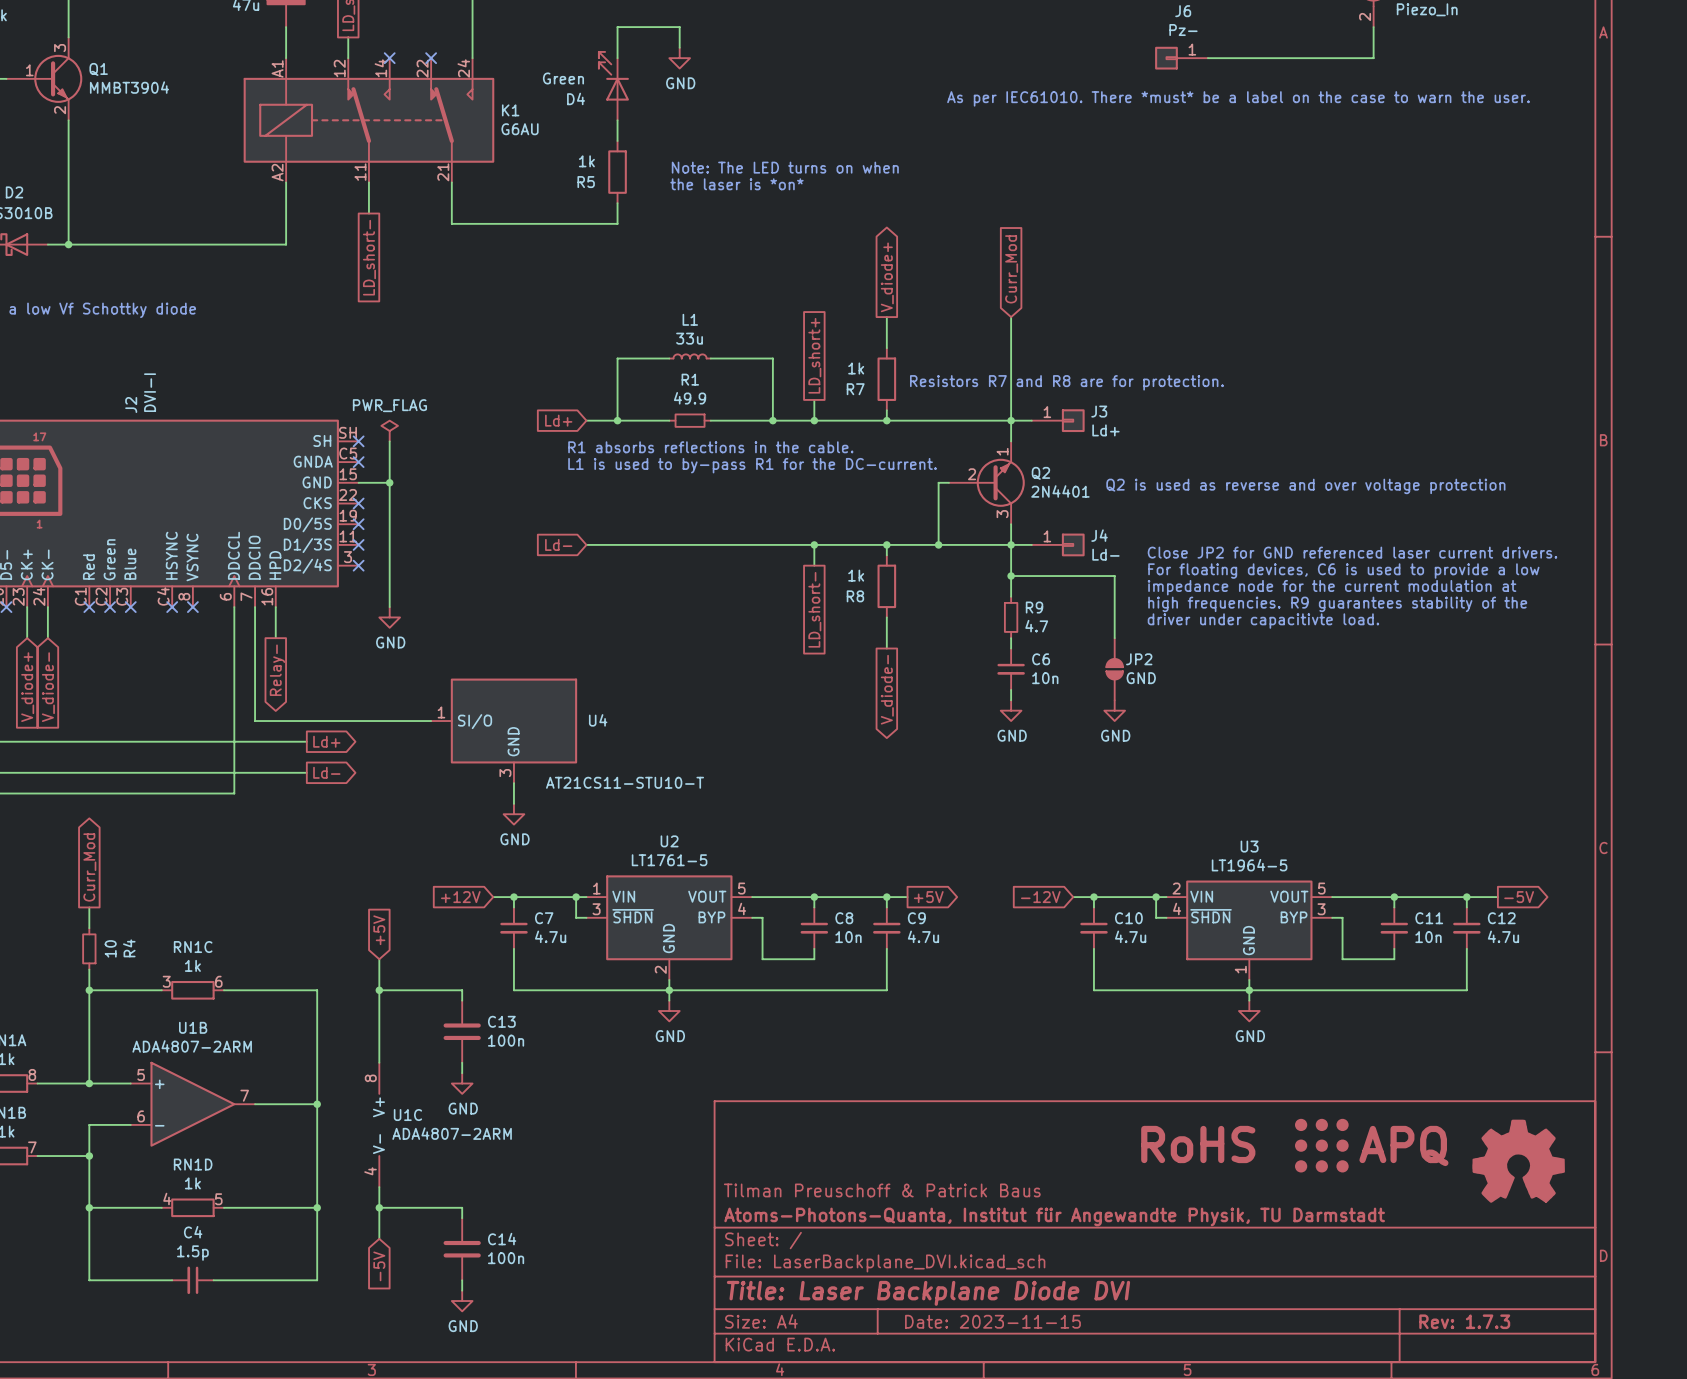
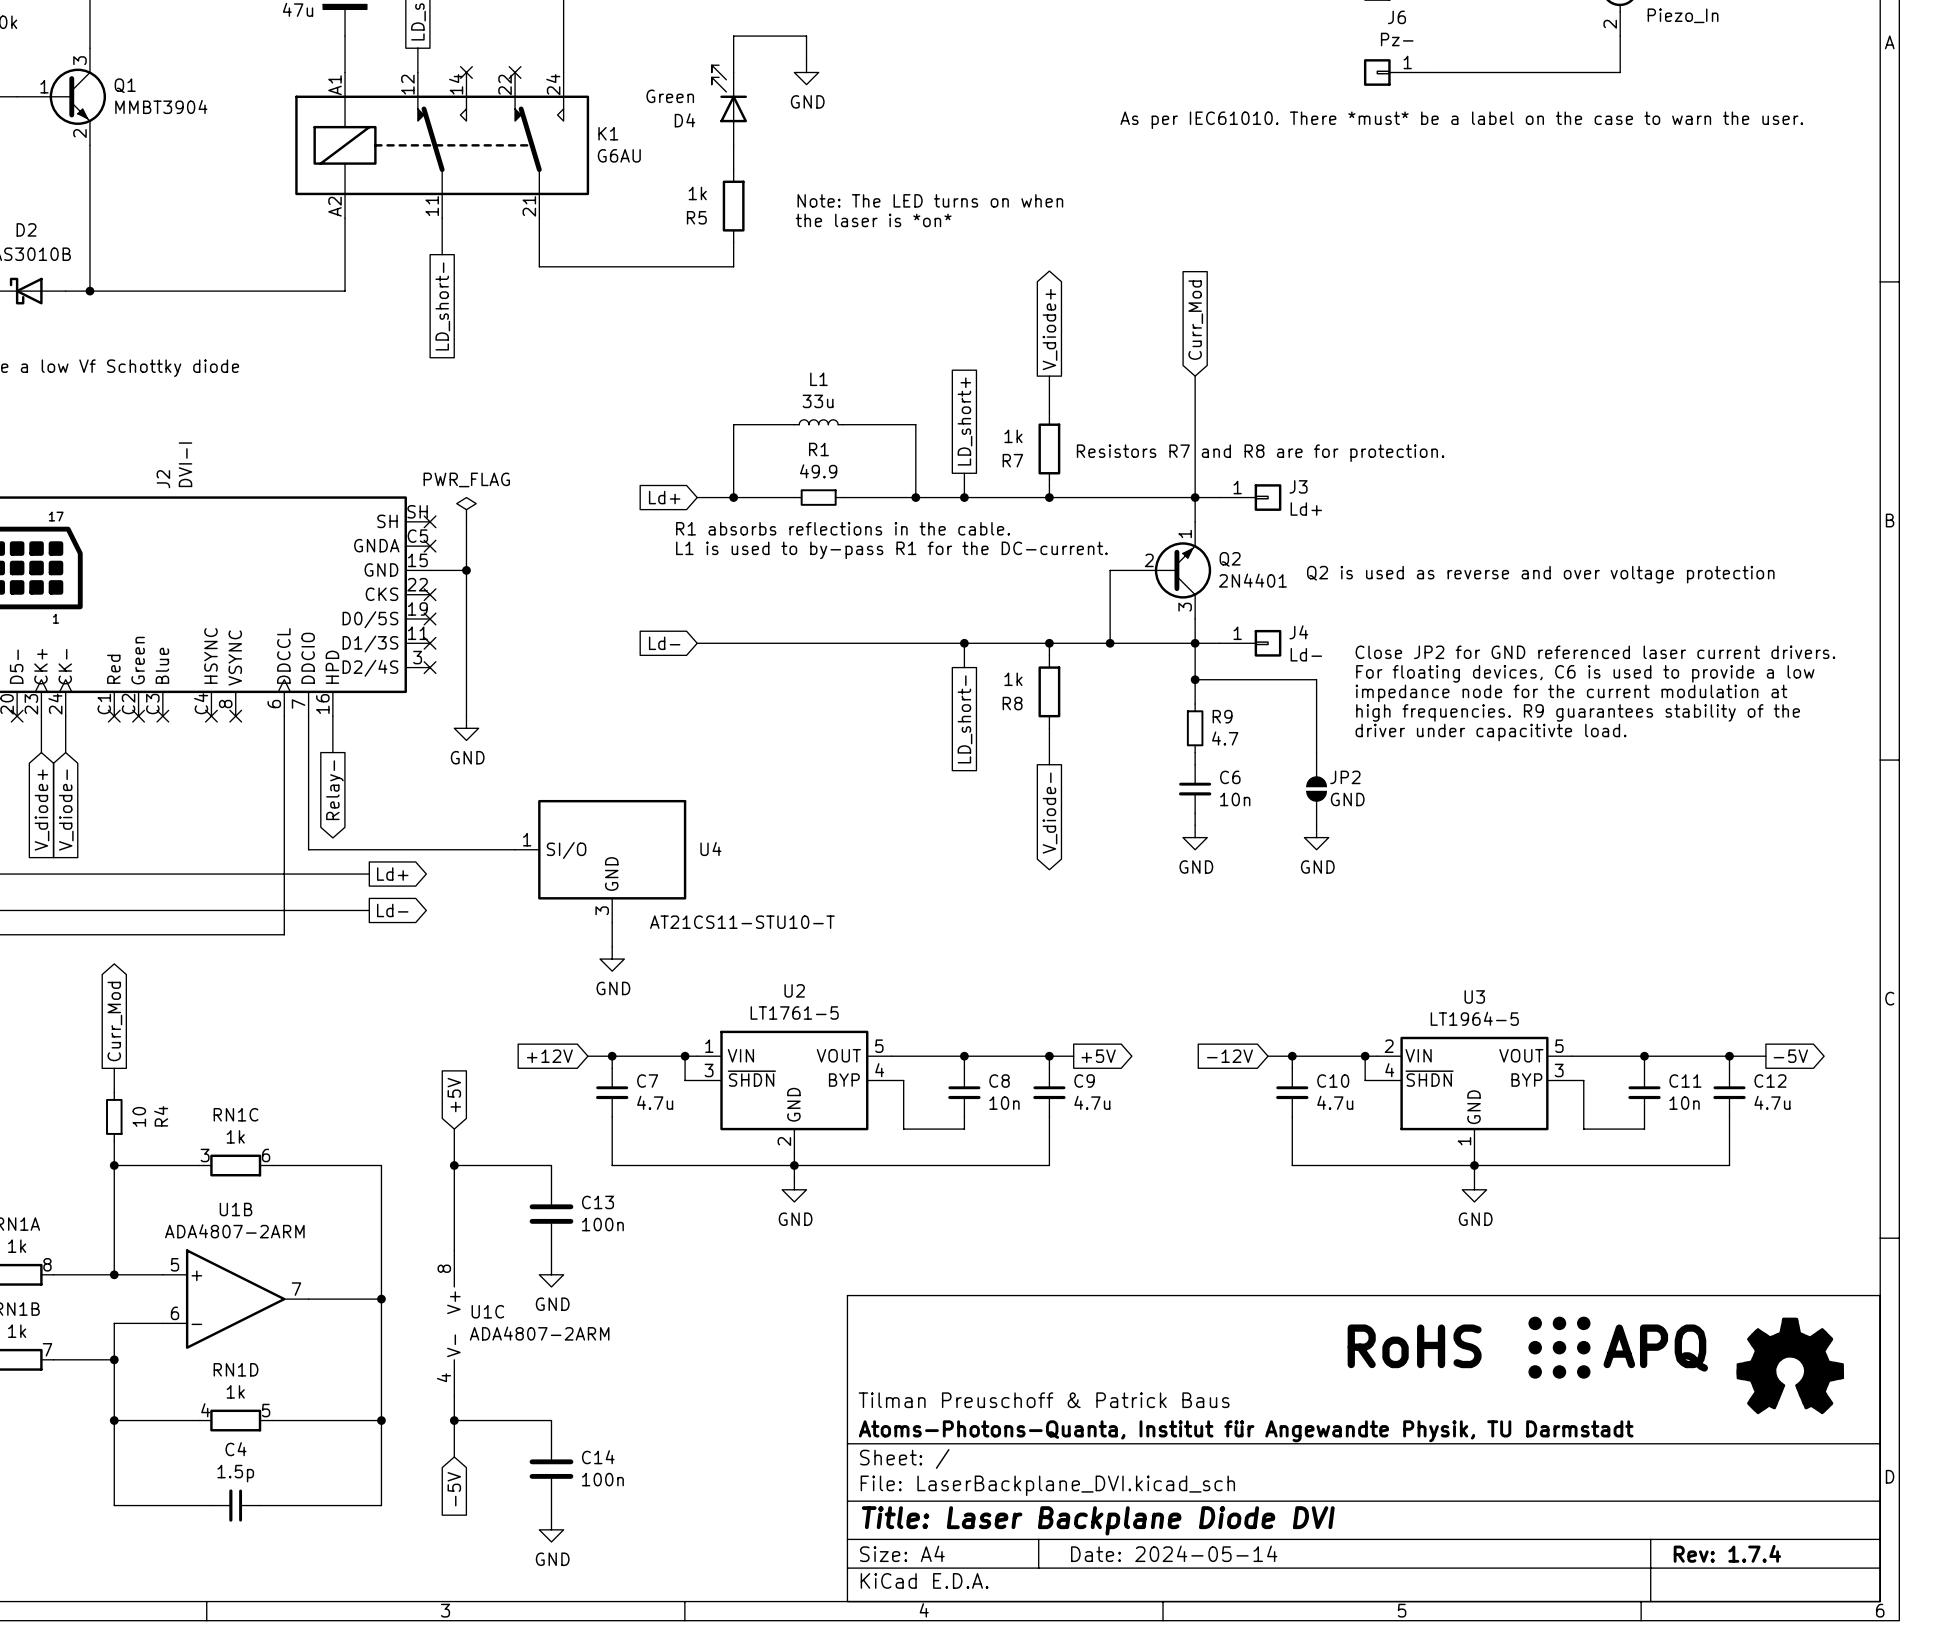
title block: Date: 2023-11-15 (992, 1321) -> Date: 2024-05-14 (1174, 1553)
title block: Rev: 1.7.3 (1464, 1321) -> Rev: 1.7.4 (1727, 1553)

